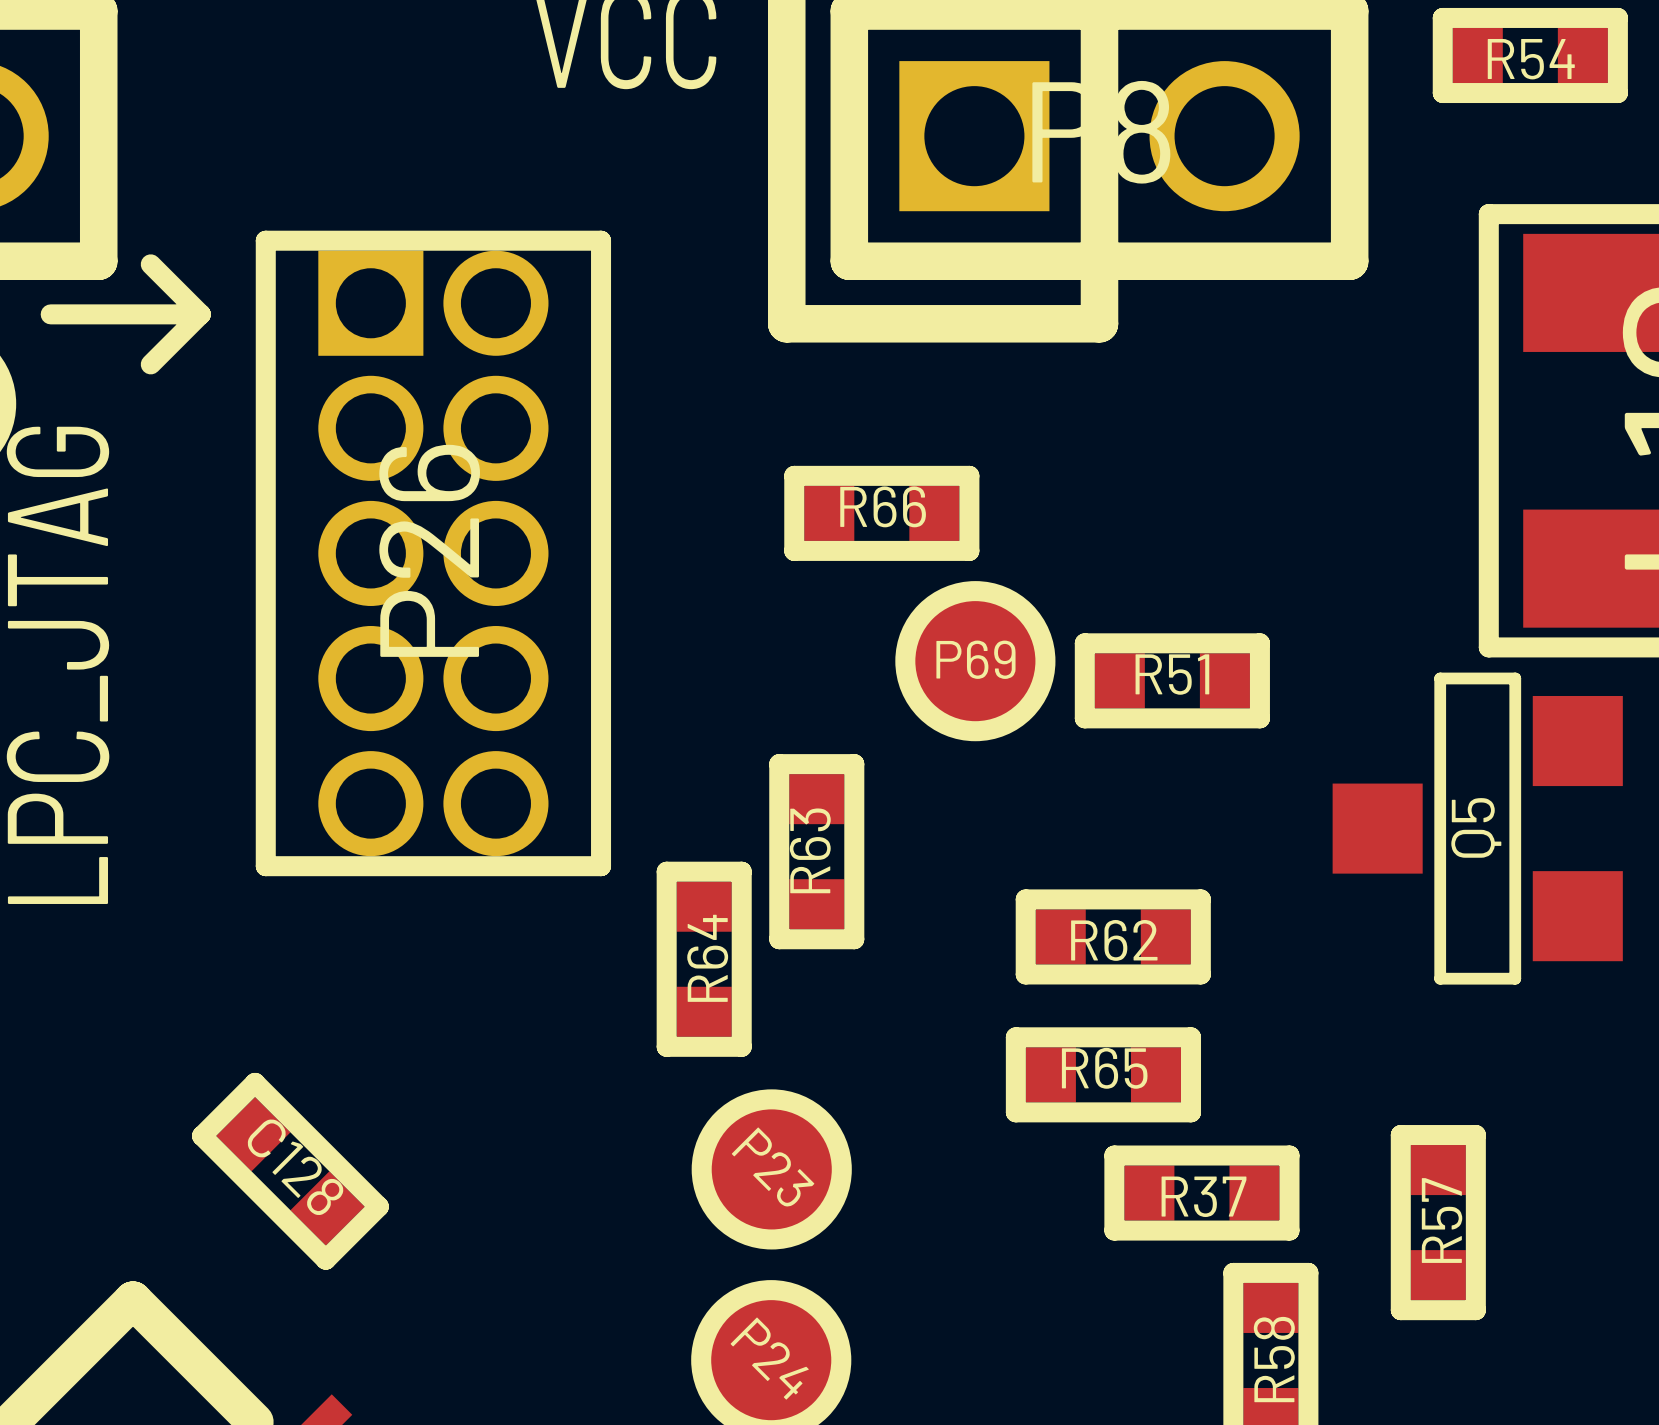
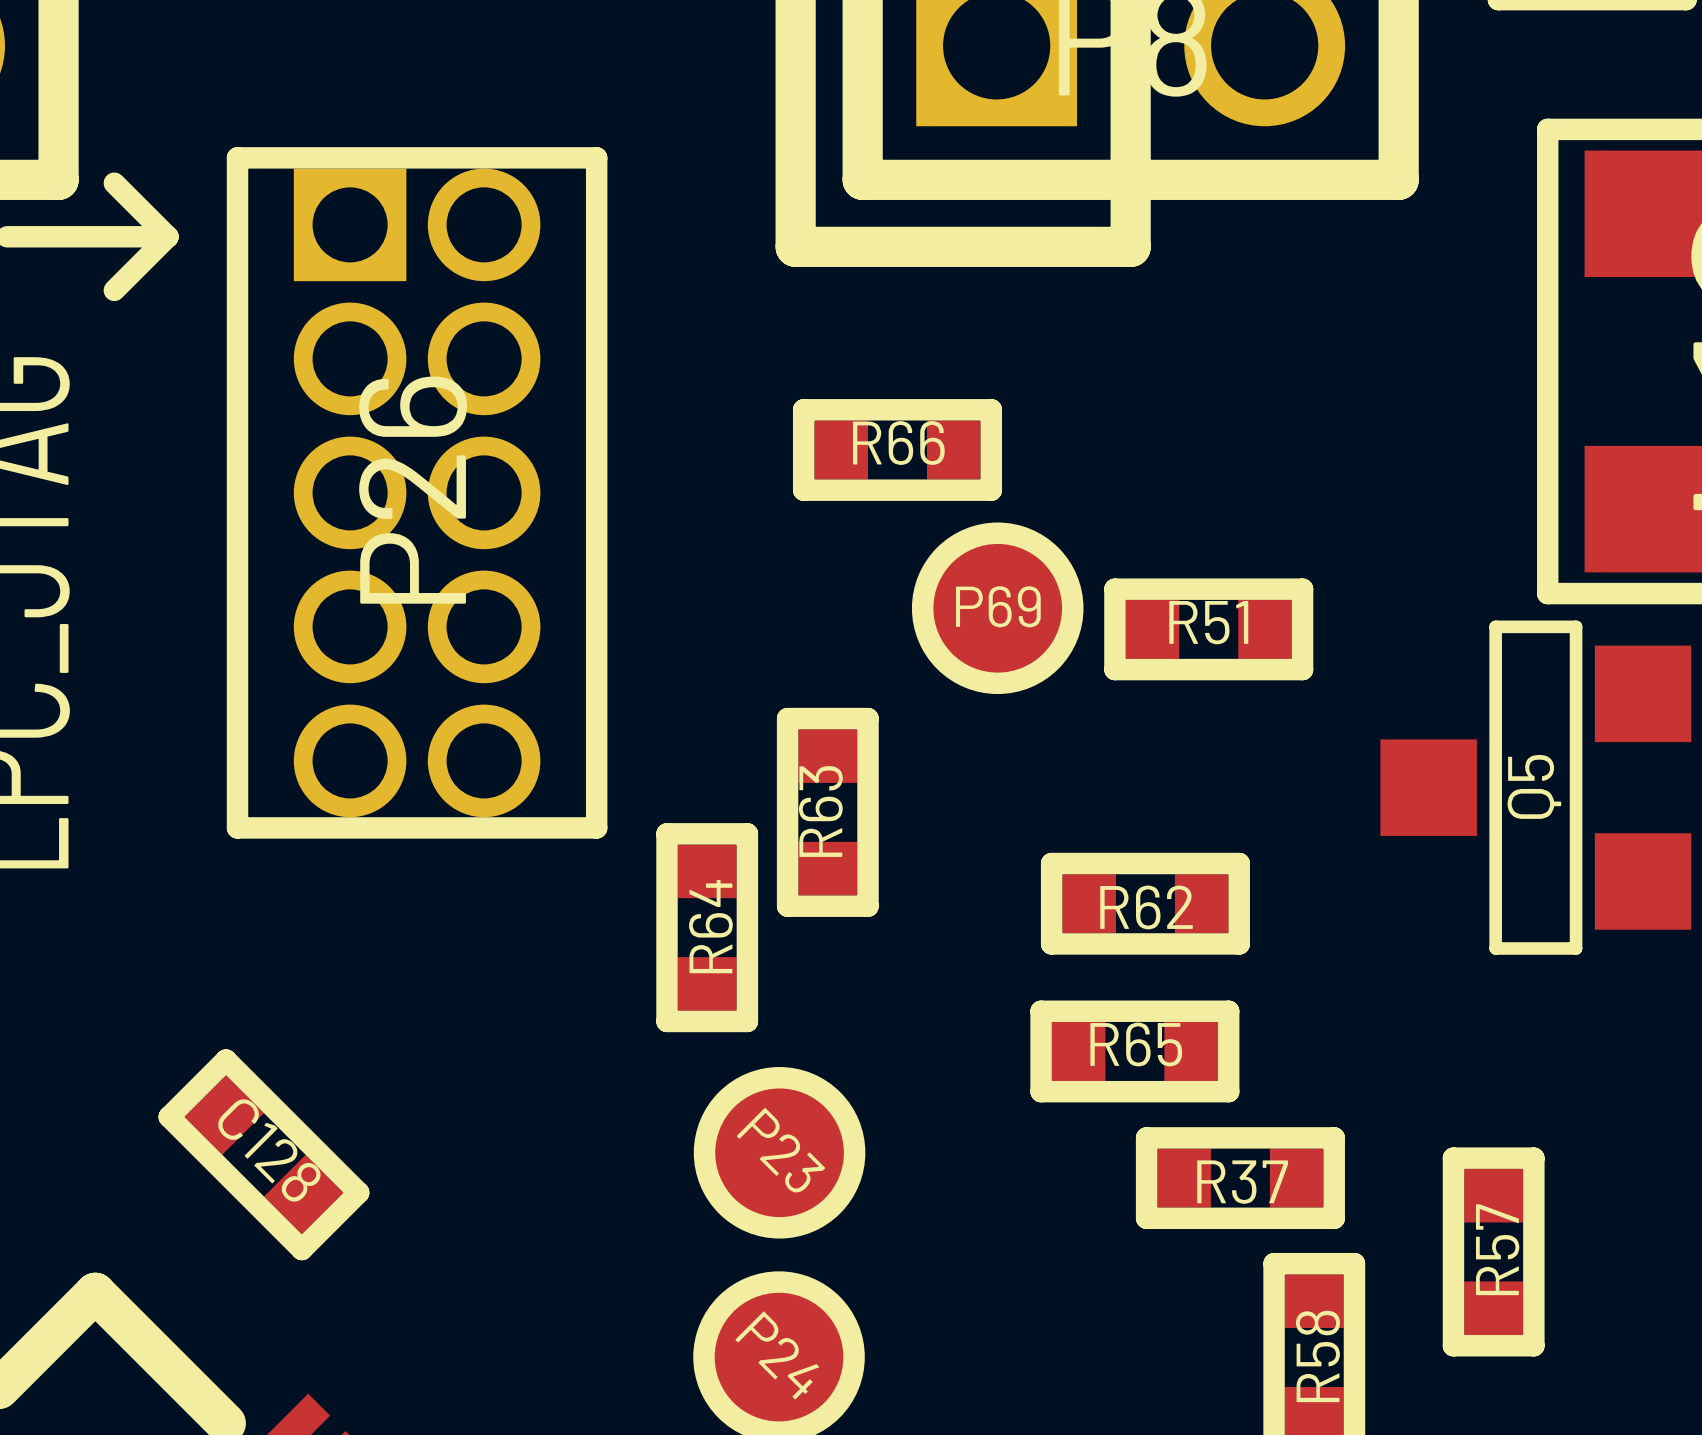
R57 position: (1438, 1222) -> (1493, 1251)

